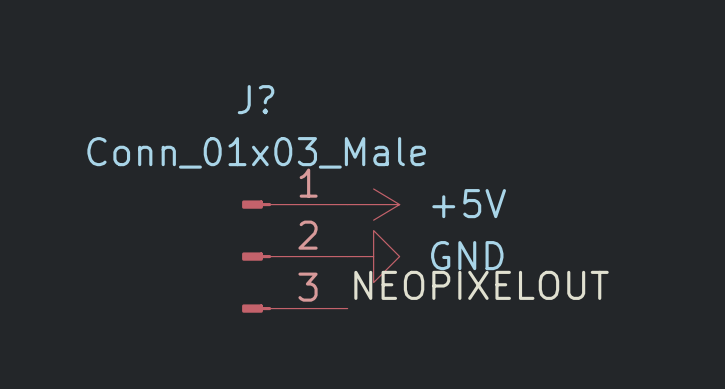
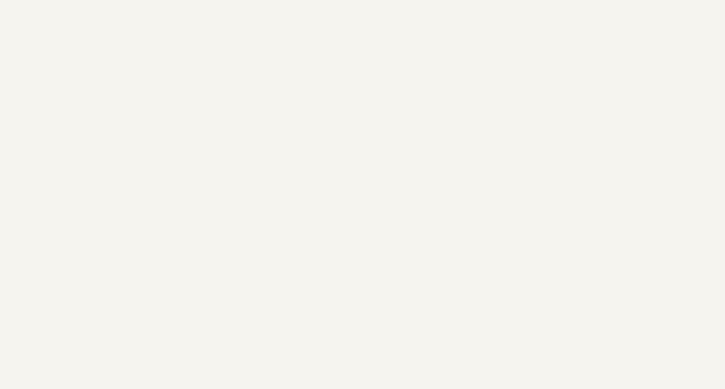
power symbol: +5V (373, 204) -> none
J?: Conn_01x03_Male (294, 256) -> none
power symbol: GND (373, 256) -> none
label: NEOPIXELOUT (481, 285) -> none

